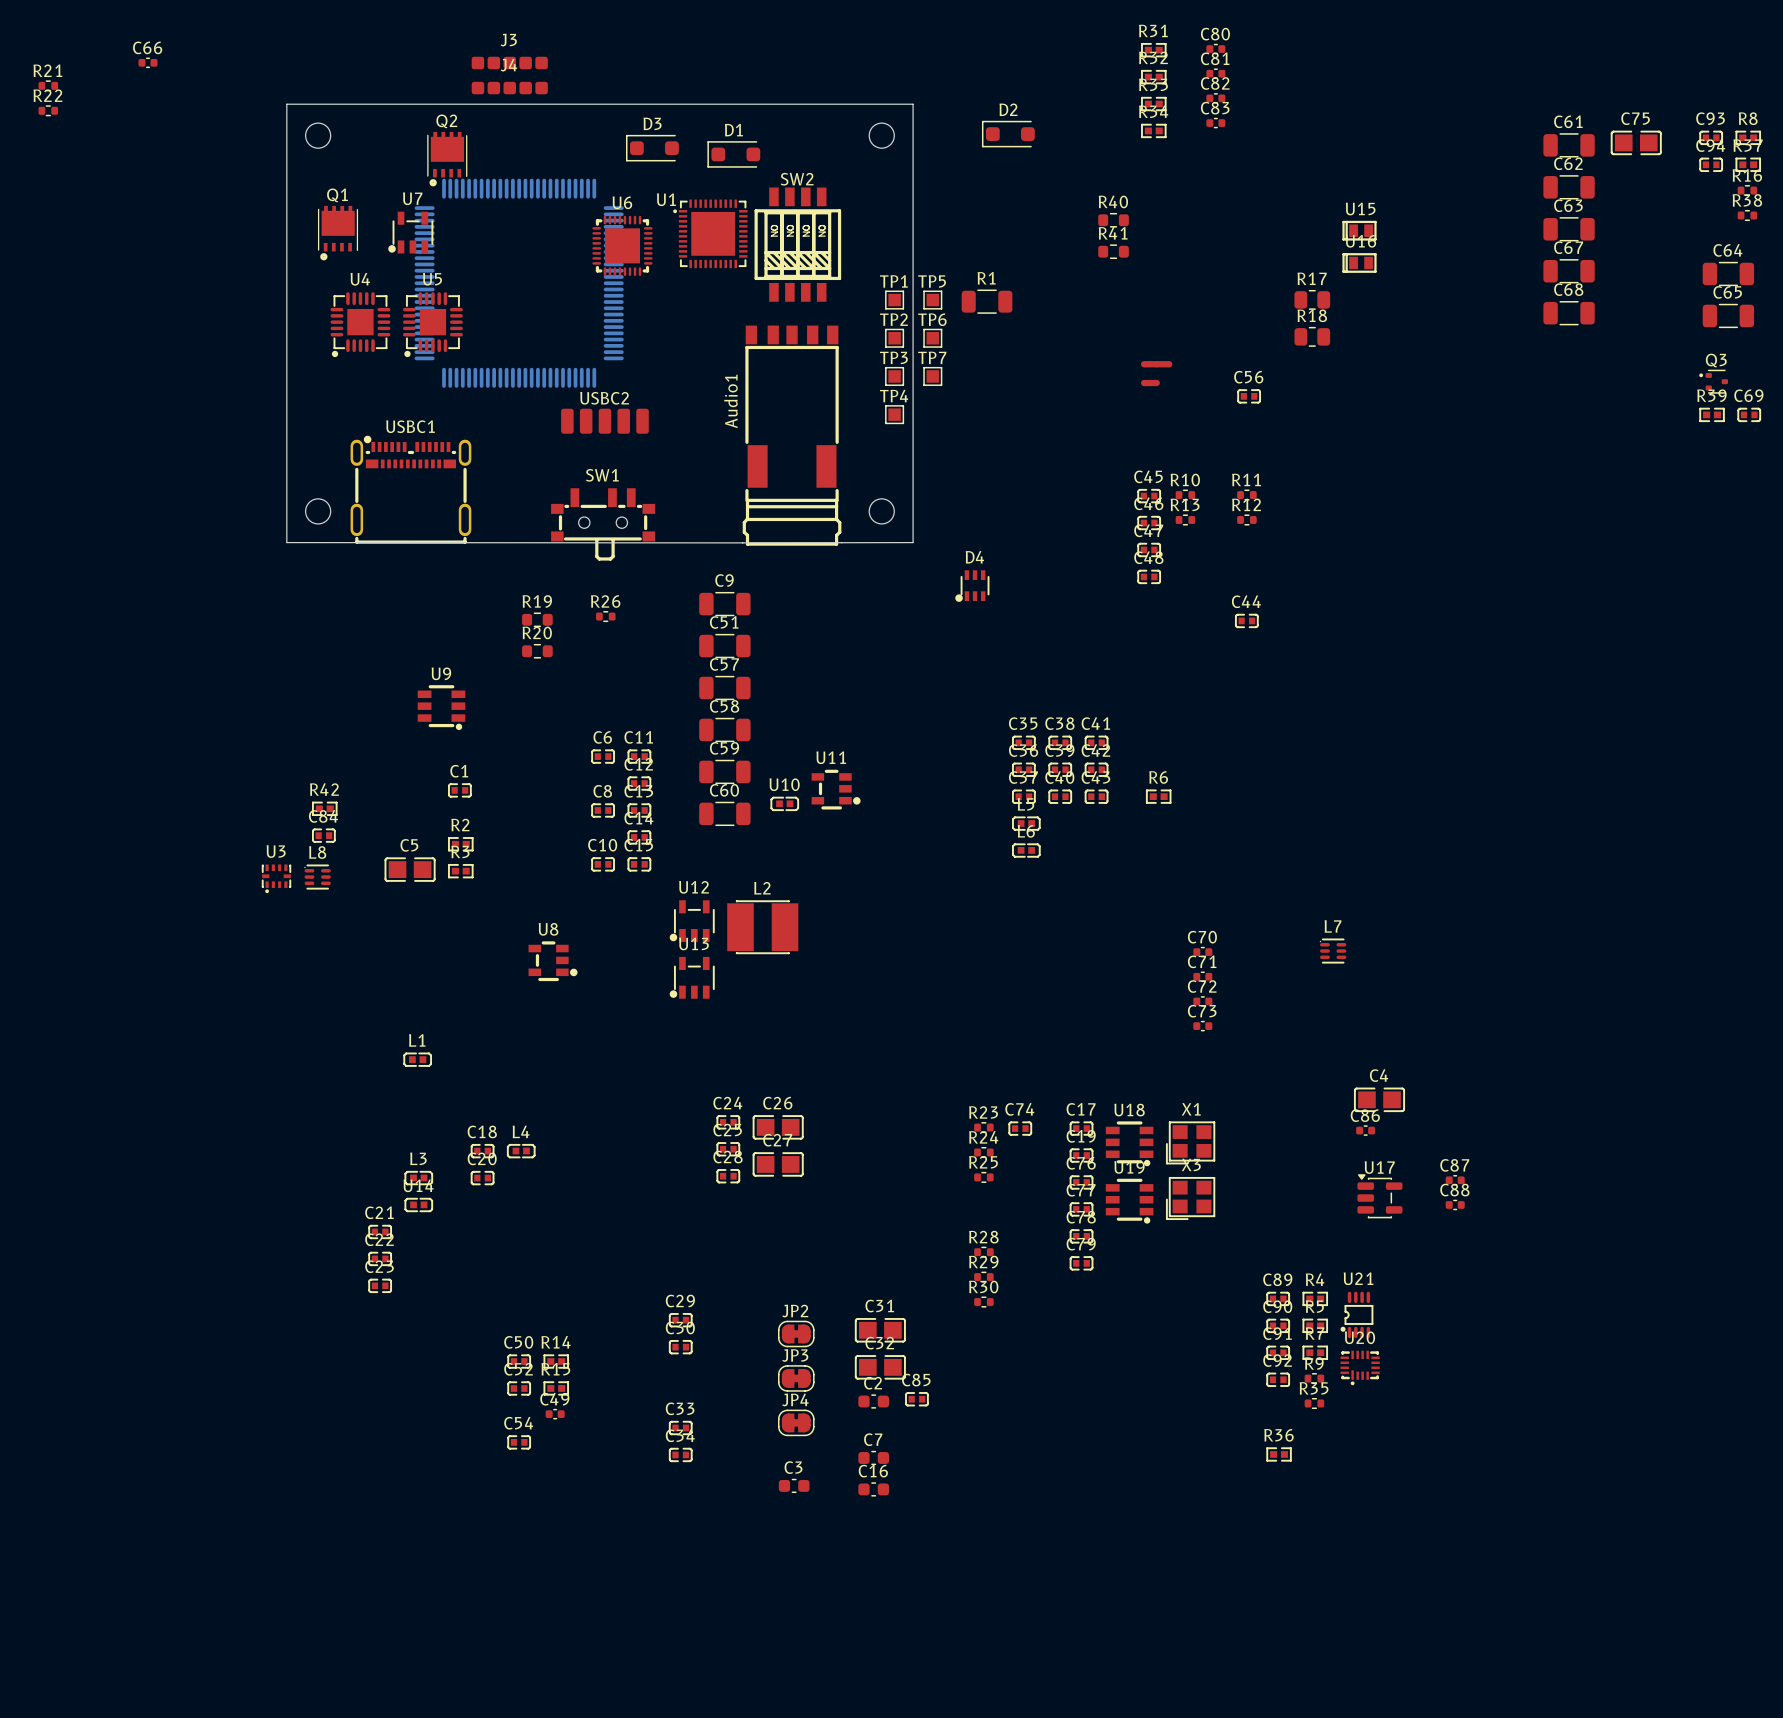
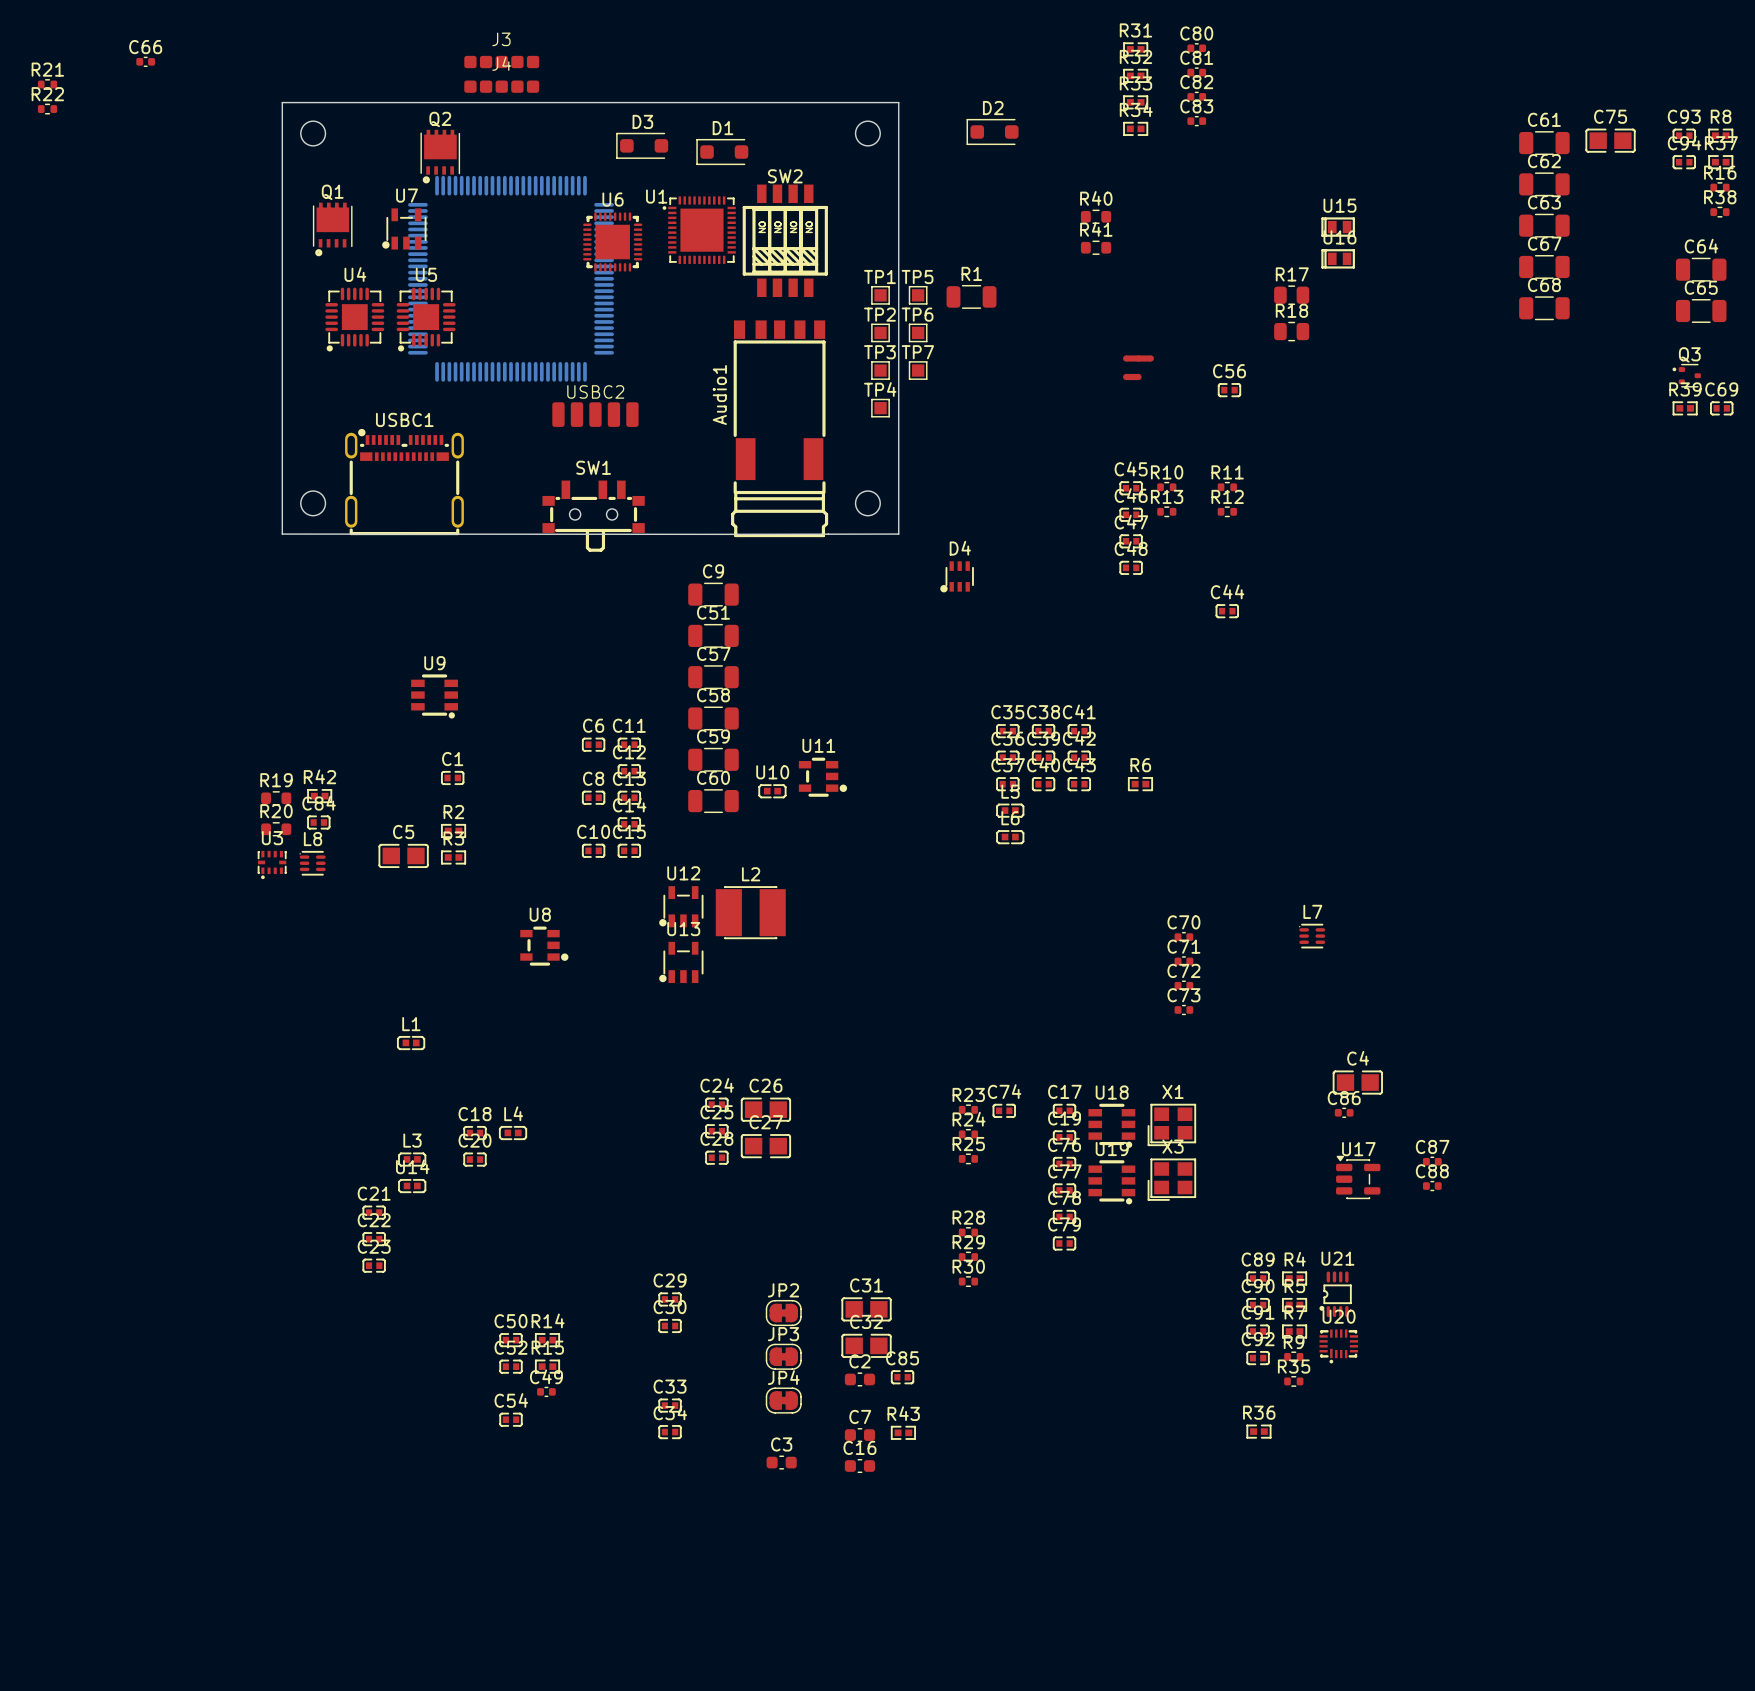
R26: (605, 616) -> none
R19 position: (537, 619) -> (276, 798)
R20 position: (537, 651) -> (276, 829)
R43: none -> (903, 1432)

